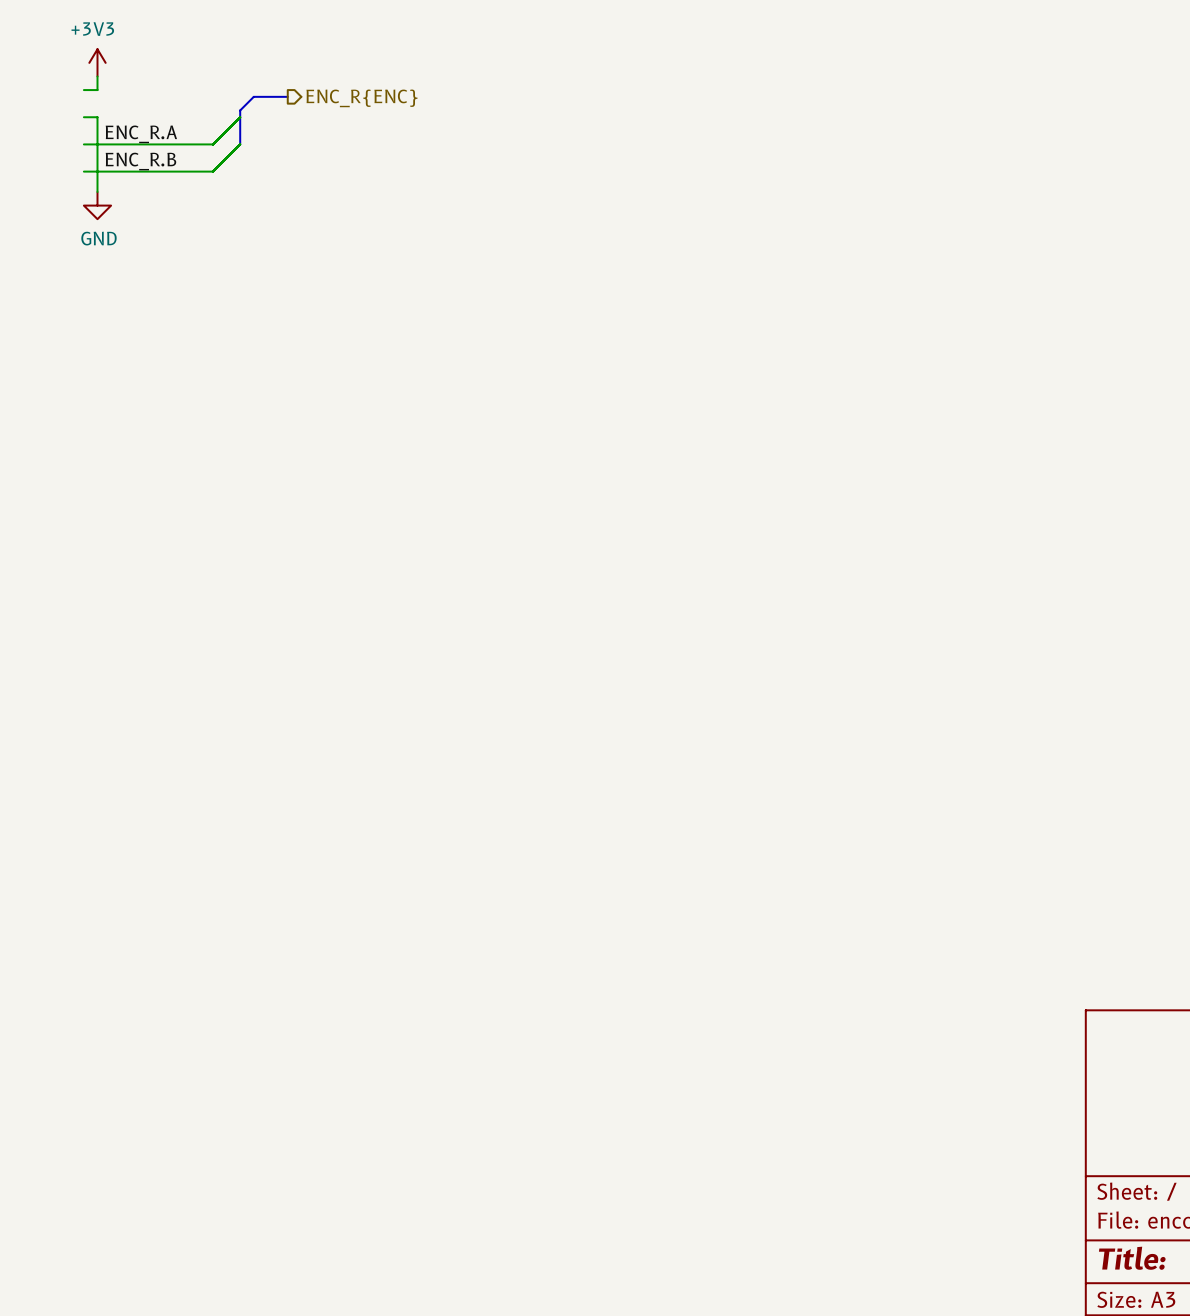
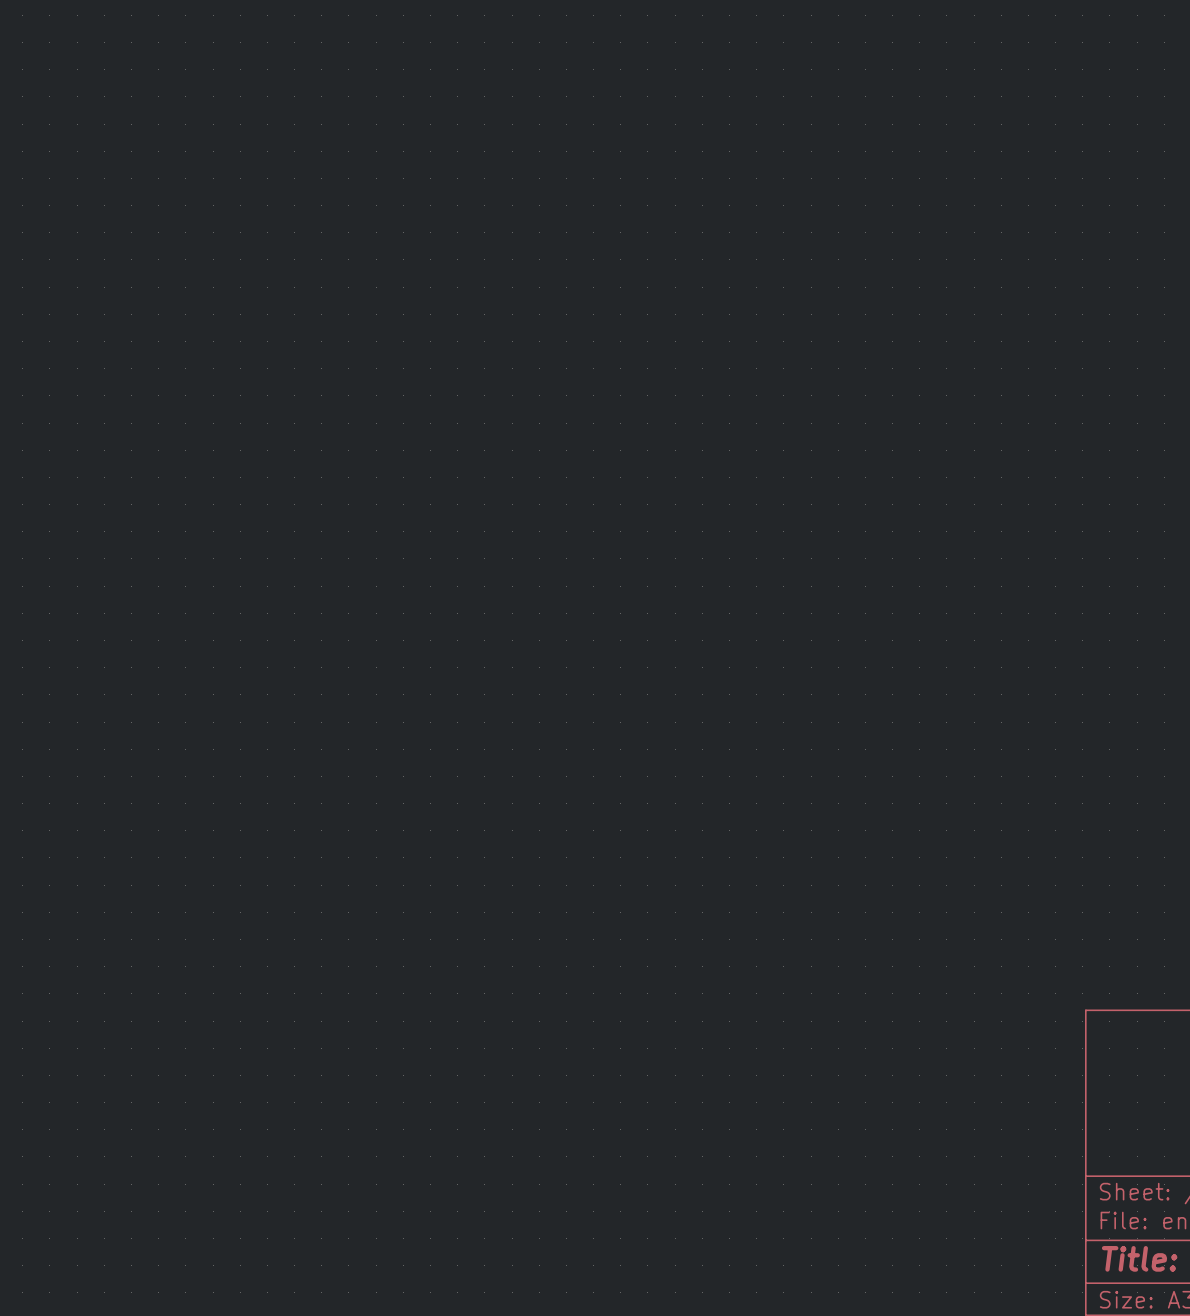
power symbol: +3V3 (97, 62) -> none
wire: (97, 76) (97, 90) (83, 90) -> none
bus: (287, 96) (253, 96) (240, 110) (240, 144) -> none
hierarchical label: ENC_R{ENC} (361, 98) -> none
wire: (83, 117) (97, 117) (97, 191) -> none
wire: (240, 117) (213, 144) (83, 144) -> none
label: ENC_R.A (141, 134) -> none
wire: (240, 144) (213, 171) (83, 171) -> none
label: ENC_R.B (140, 161) -> none
power symbol: GND (97, 205) -> none

